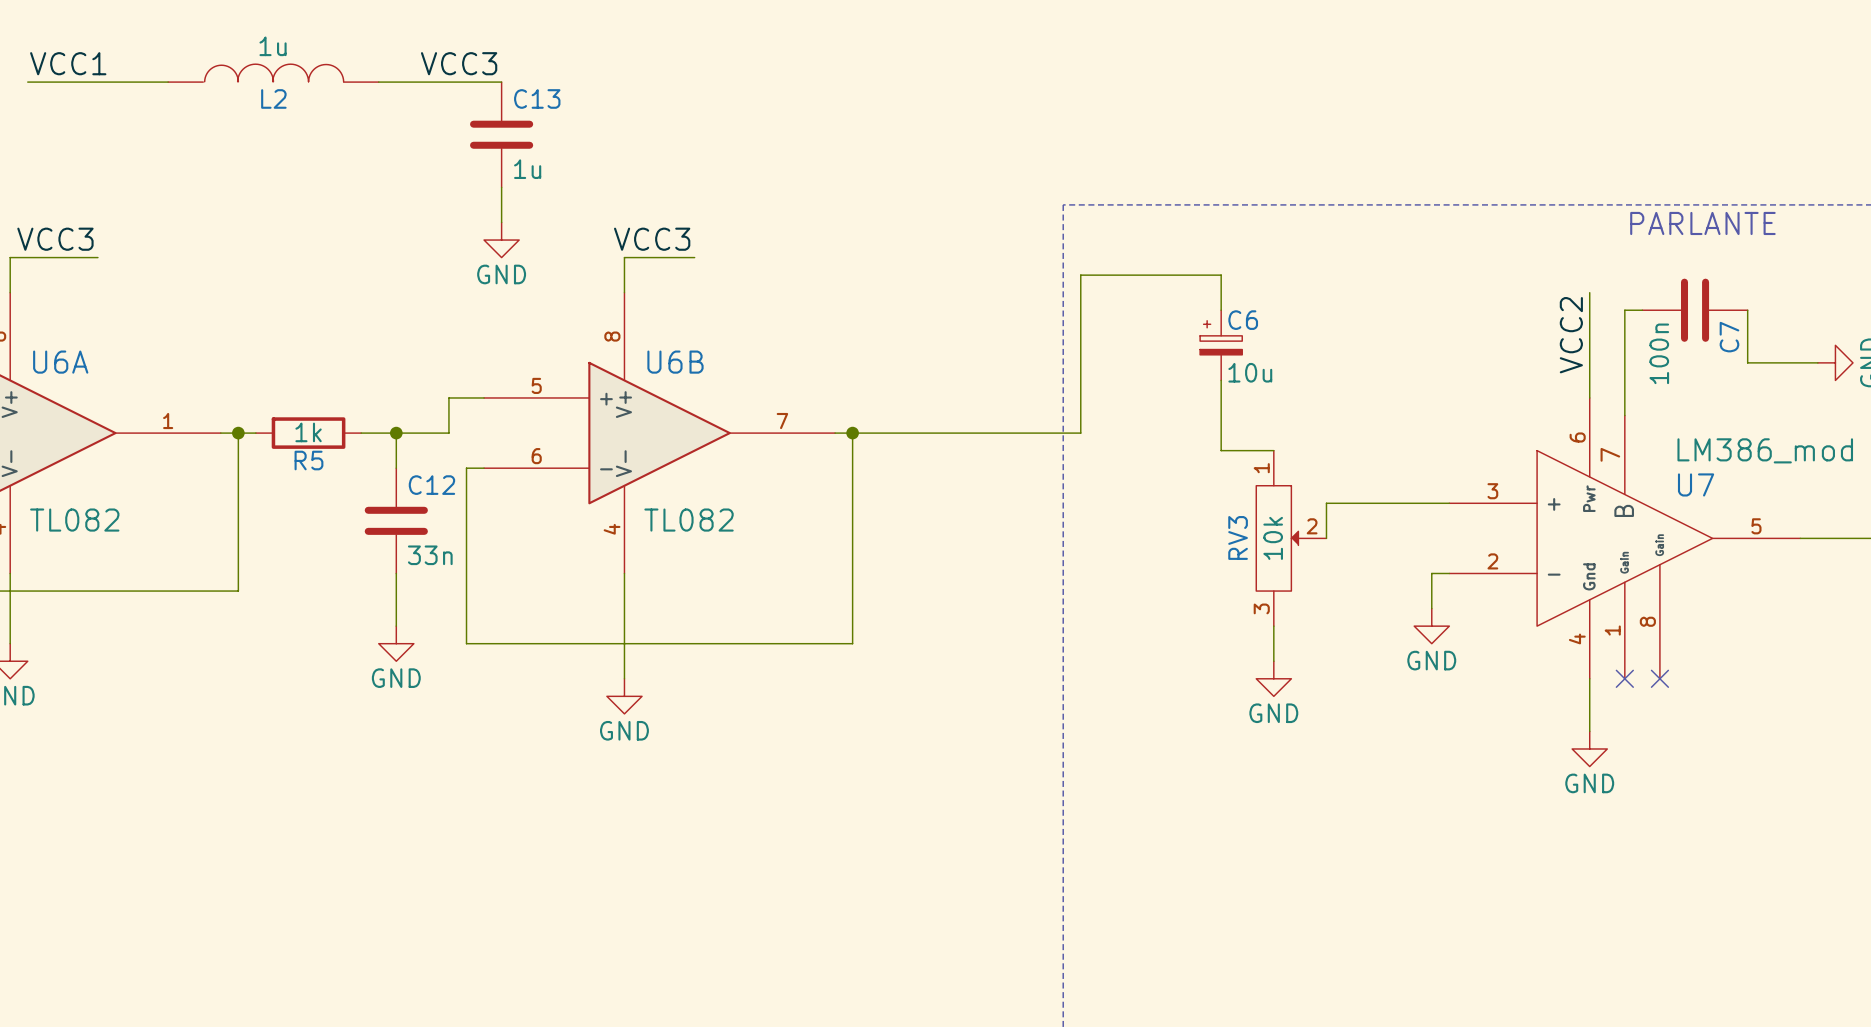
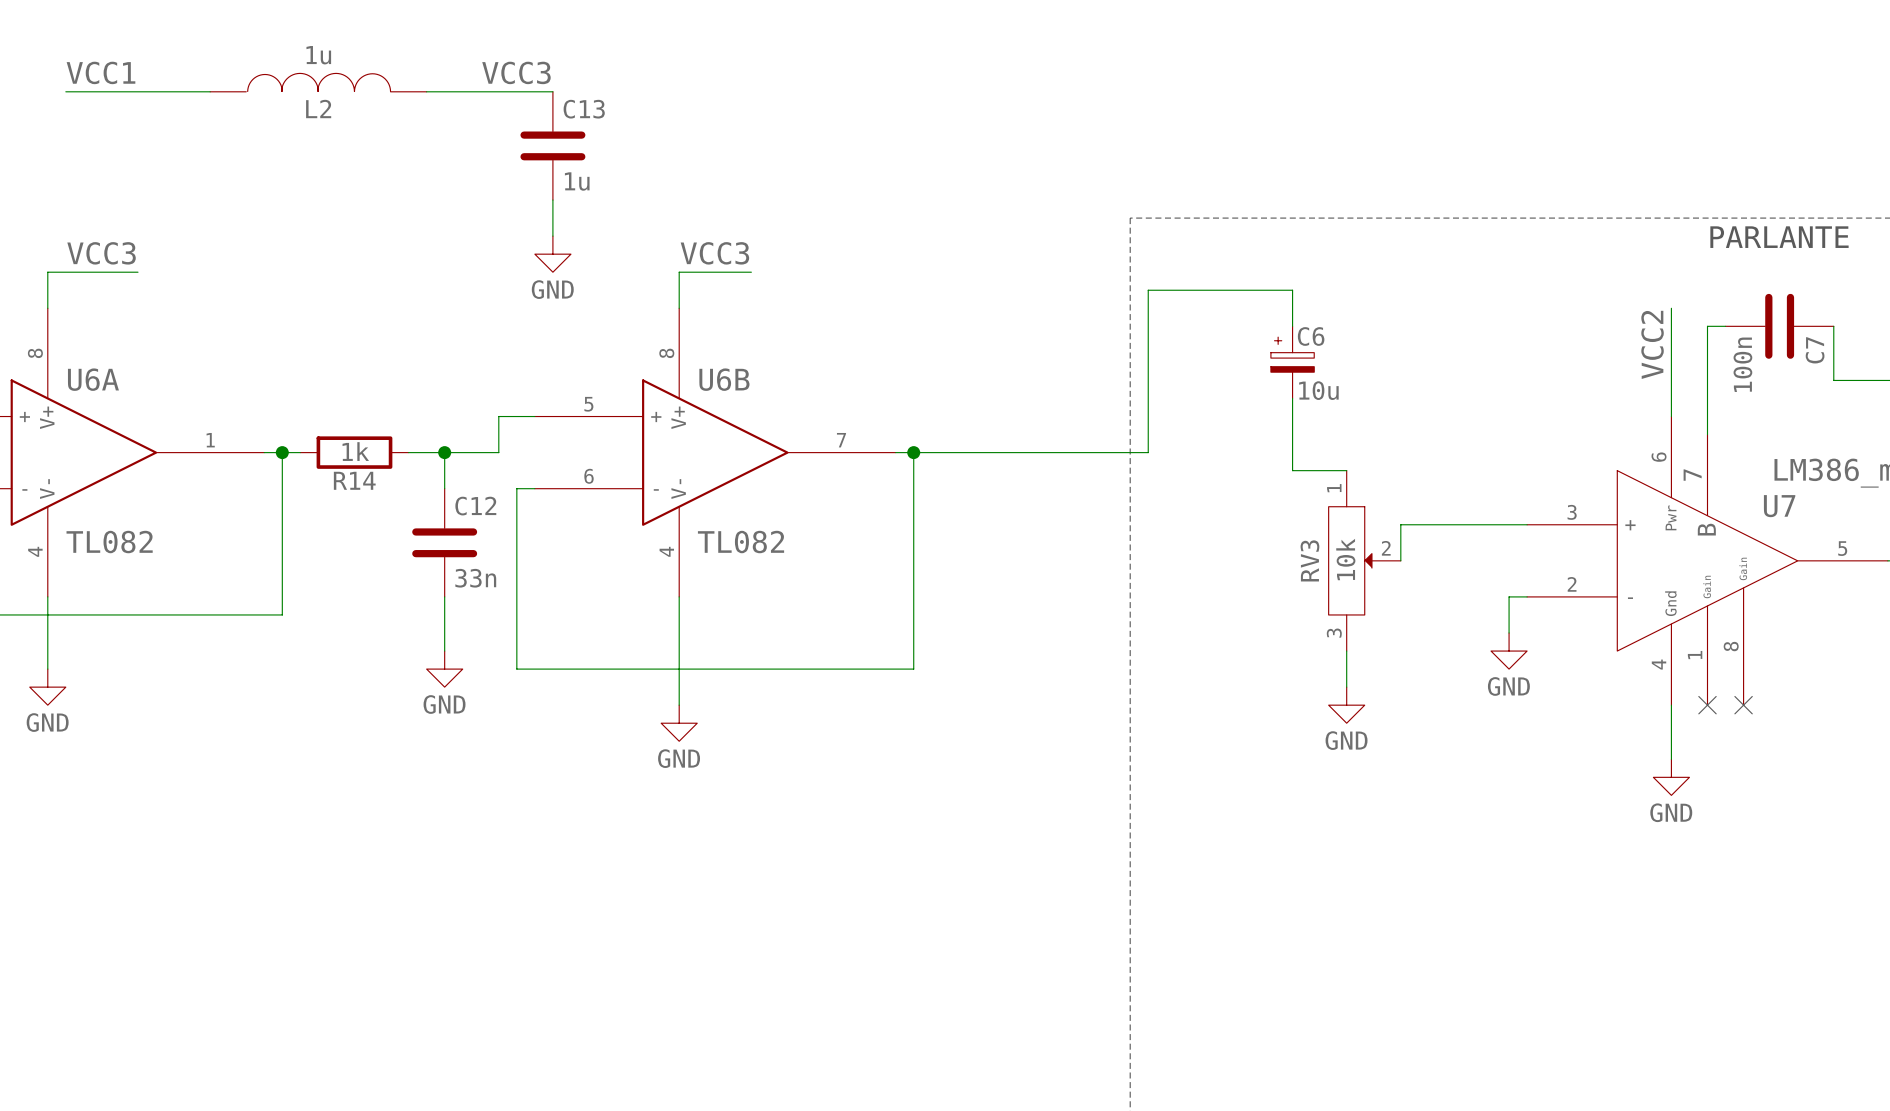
R5 name: R5 (308, 460) -> R14 (354, 480)

